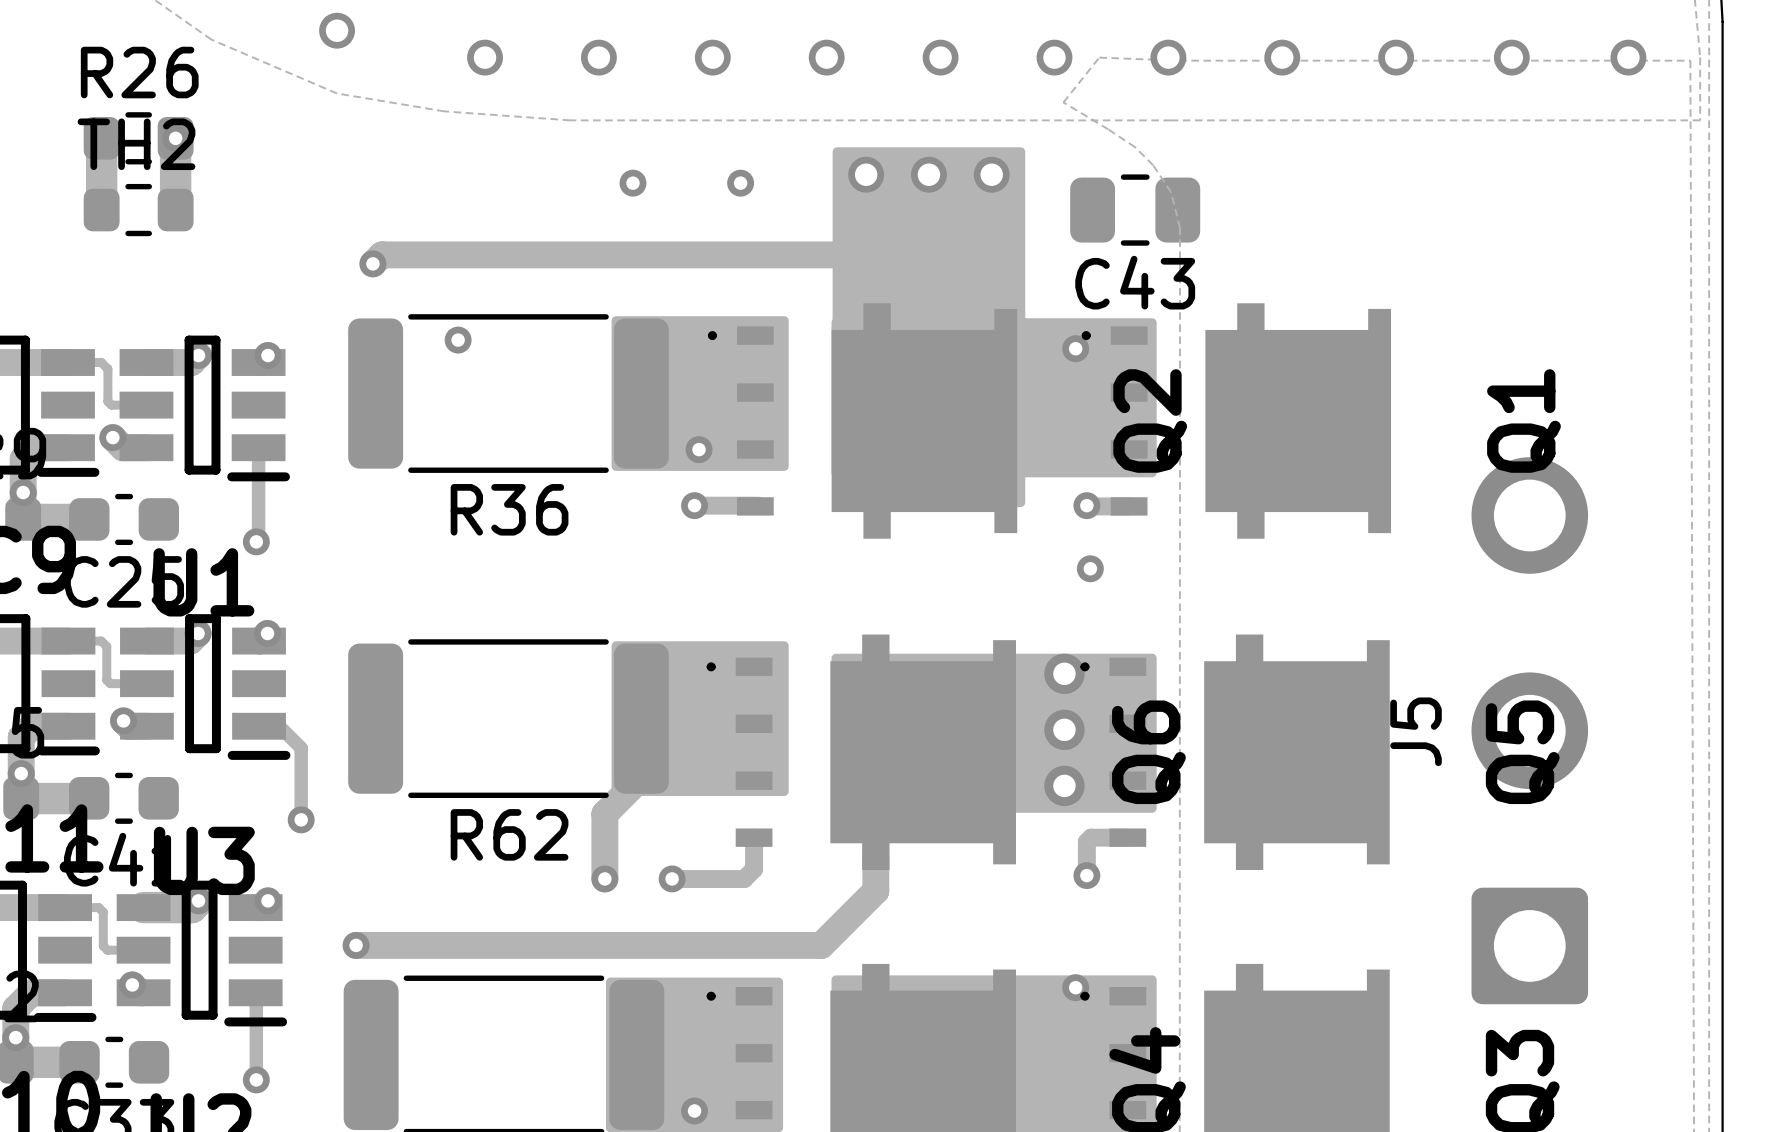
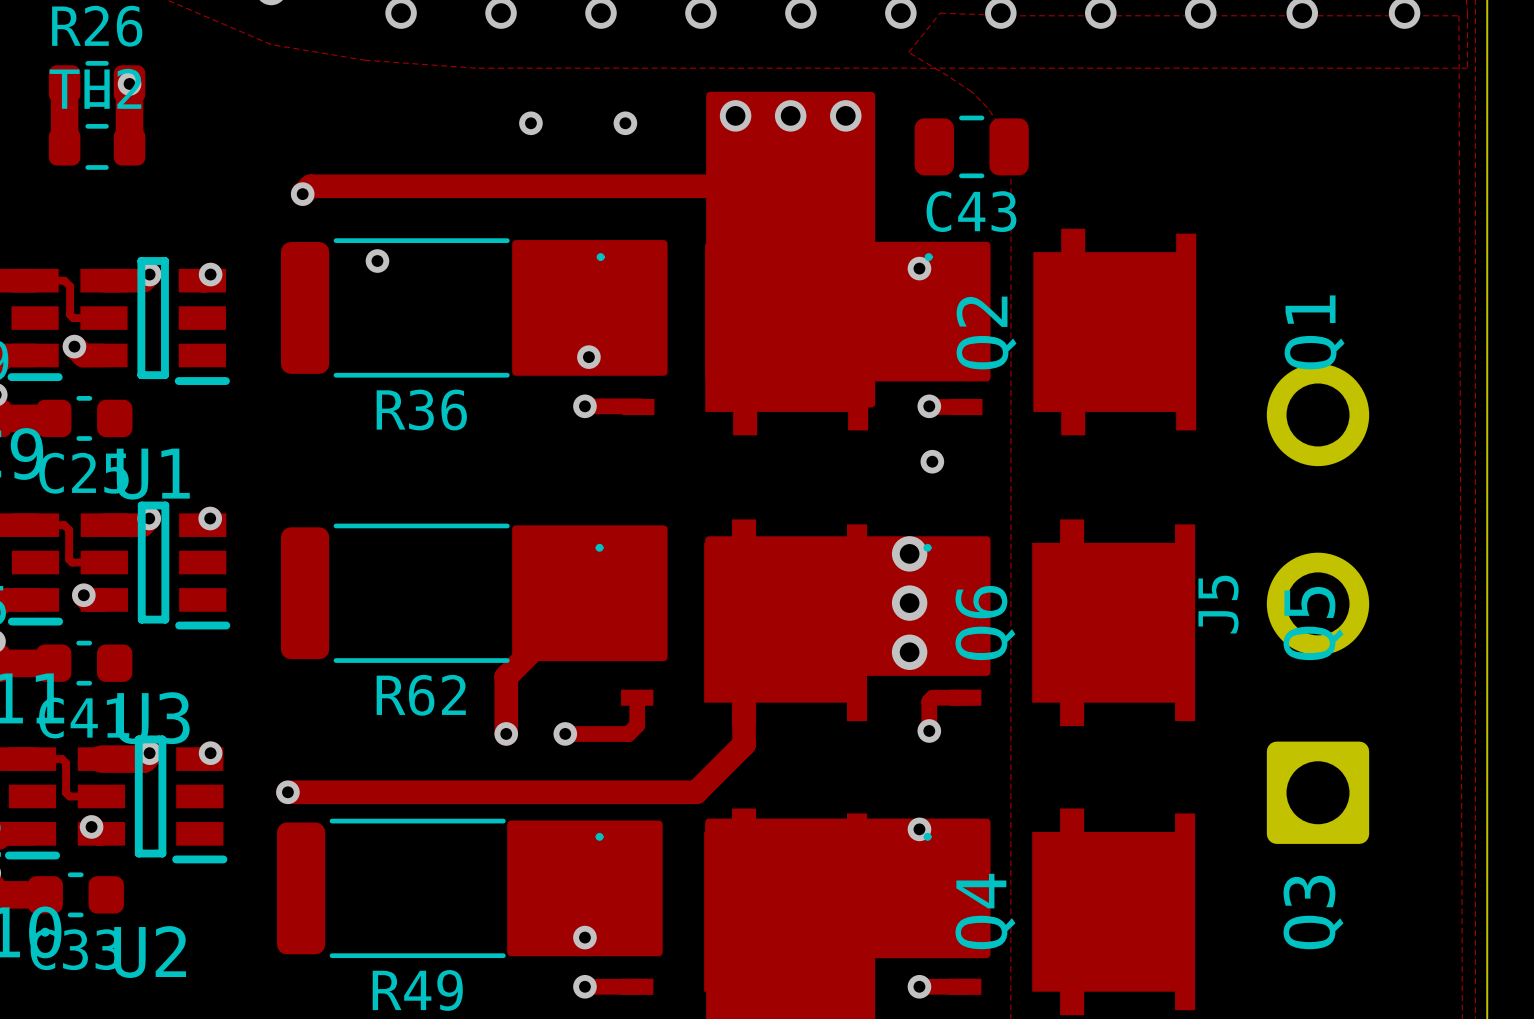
track: (258, 447) (258, 539) (256, 541) -> none
via: (256, 541) -> none
track: (259, 726) (279, 726) (301, 748) (301, 819) -> none
via: (301, 819) -> none
track: (255, 992) (256, 1079) -> none
via: (256, 1079) -> none

